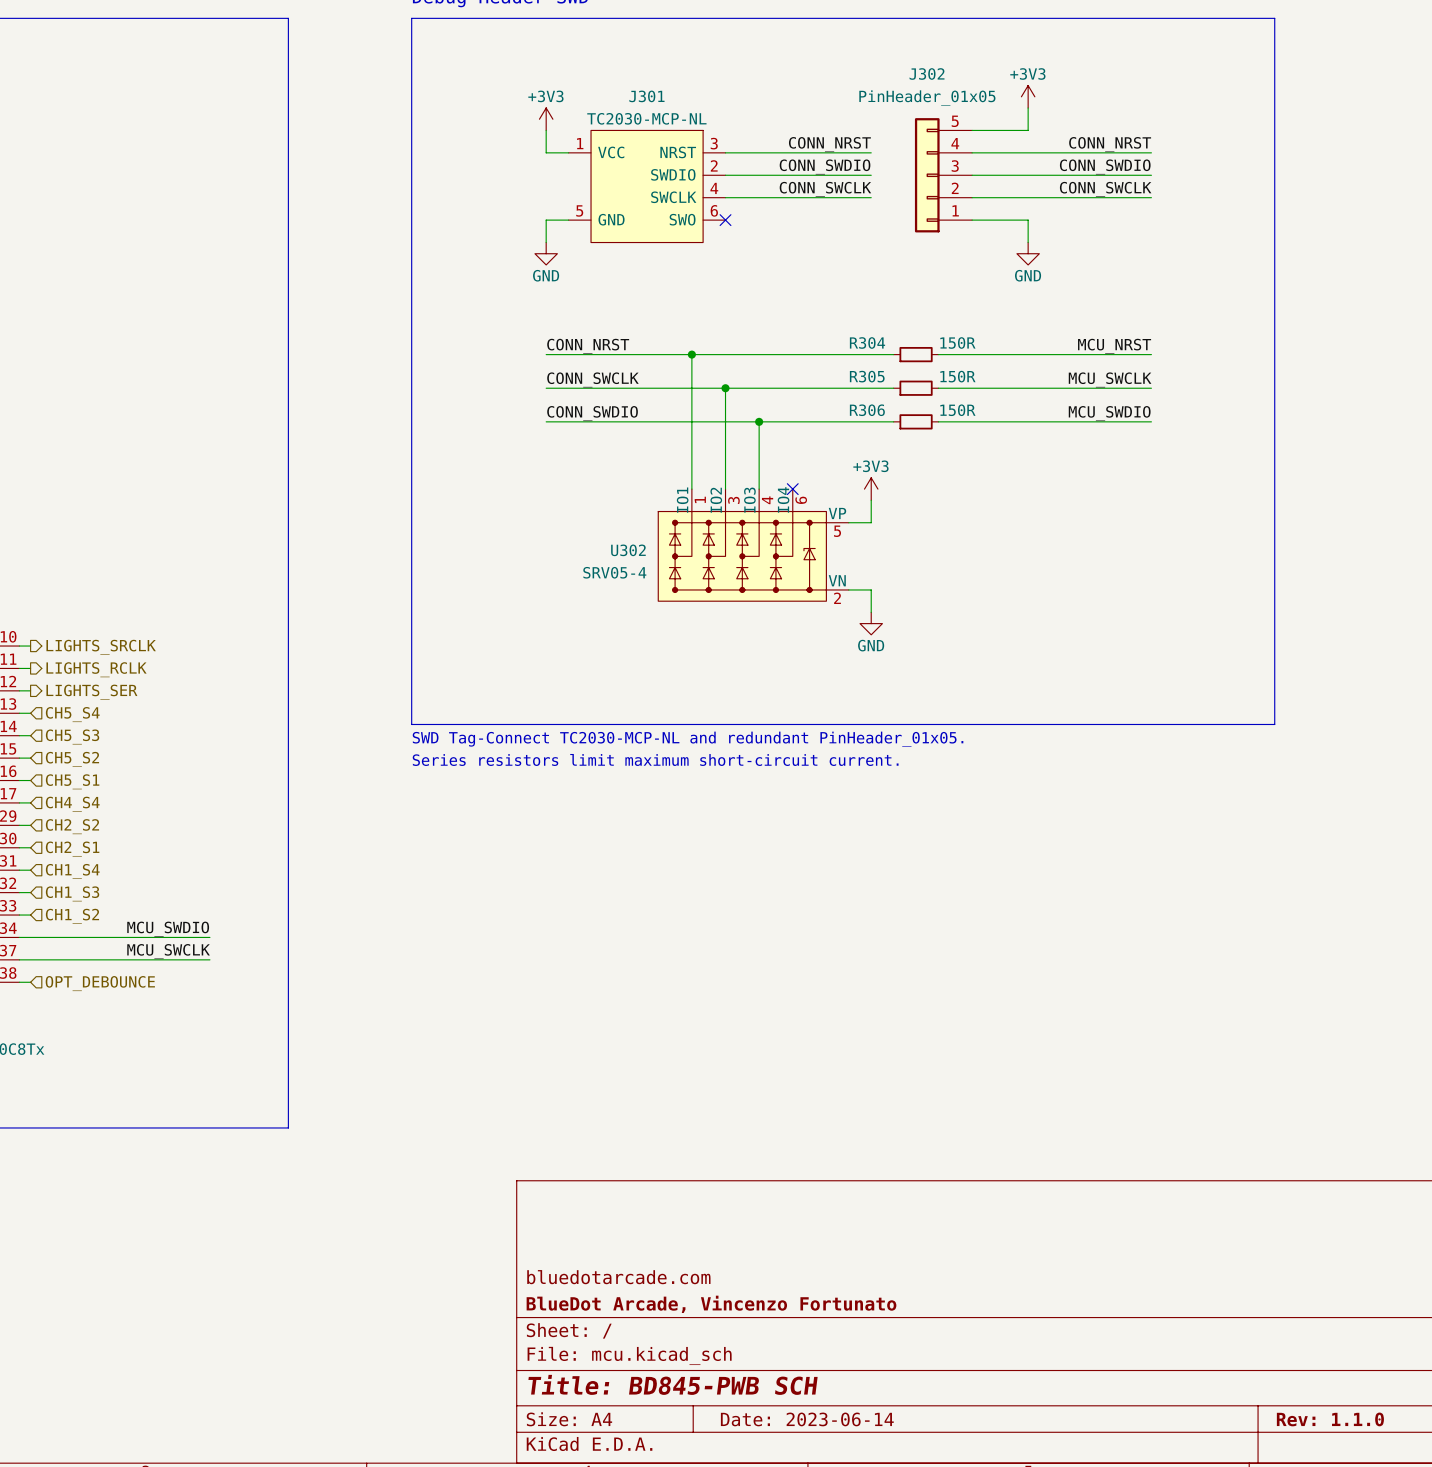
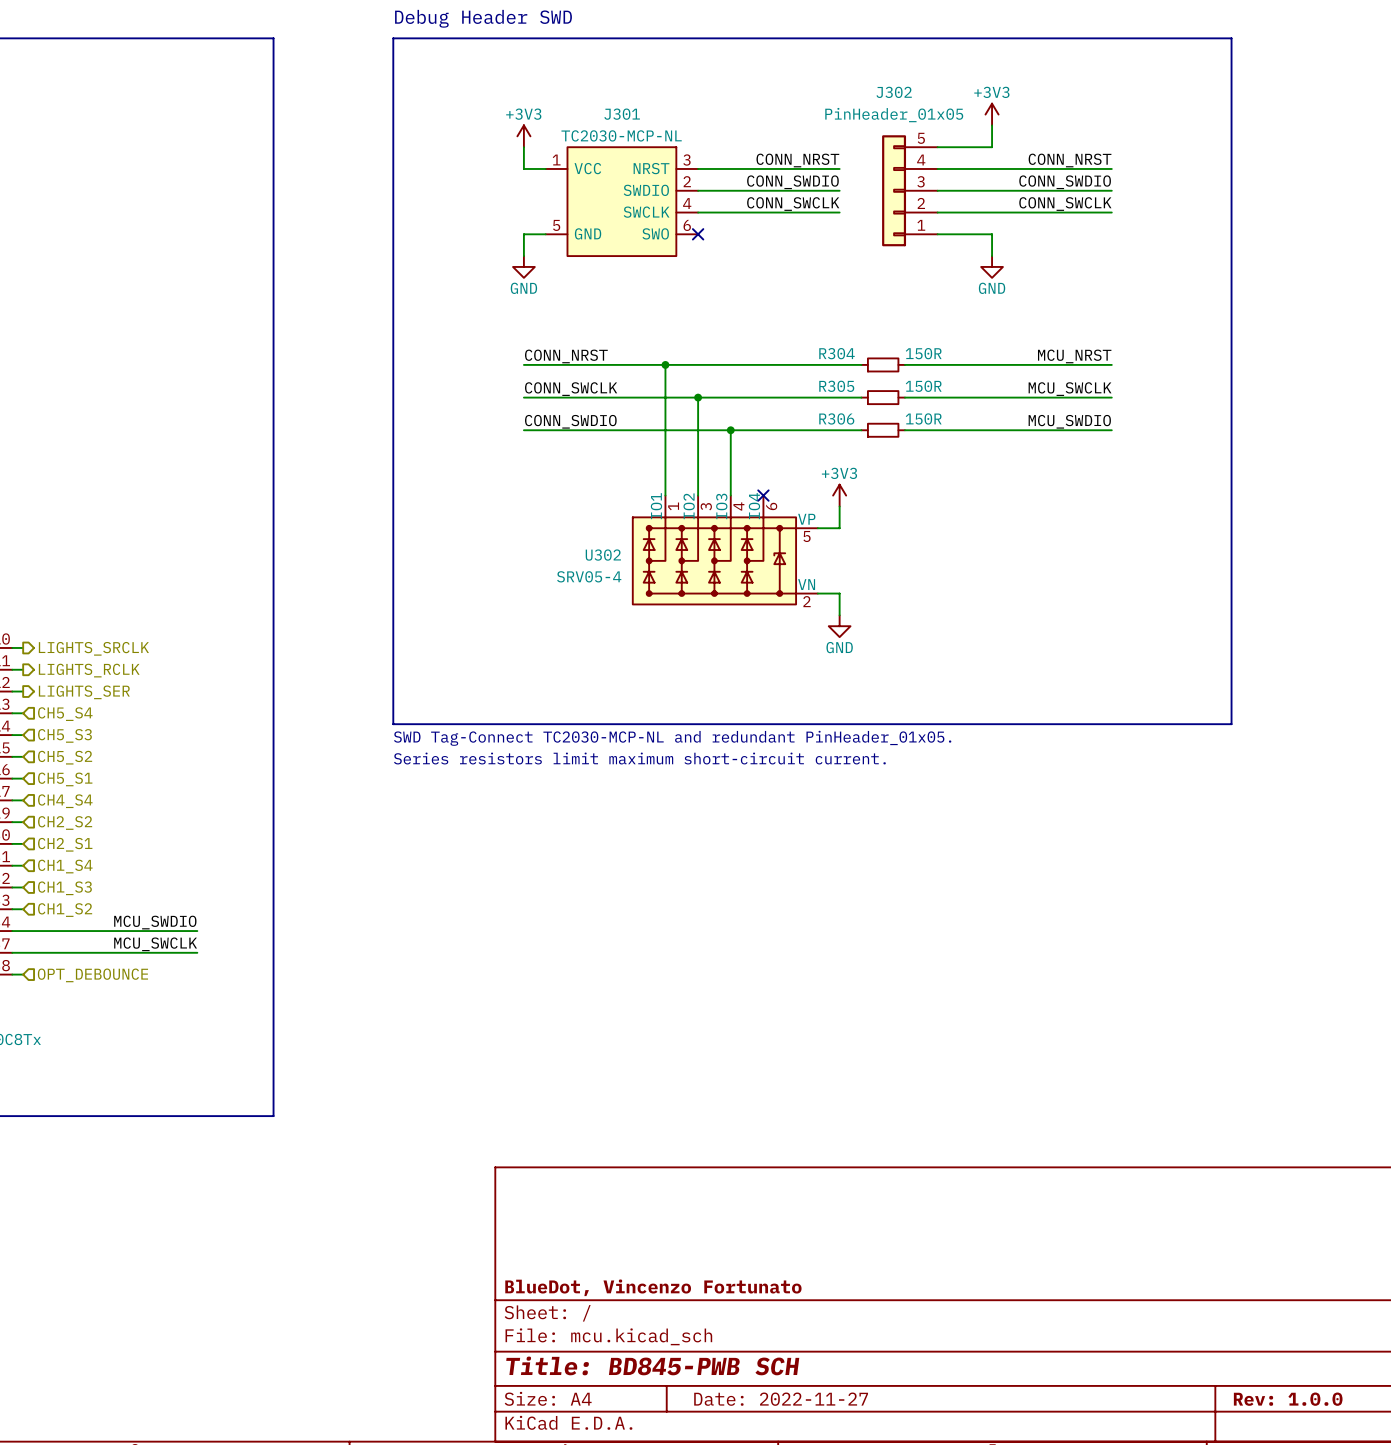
title block: bluedotarcade.com (618, 1277) -> none
title block: BlueDot Arcade, Vincenzo Fortunato (711, 1304) -> BlueDot, Vincenzo Fortunato (653, 1287)
title block: Date: 2023-06-14 (807, 1419) -> Date: 2022-11-27 (781, 1399)
title block: Rev: 1.1.0 (1330, 1419) -> Rev: 1.0.0 (1288, 1399)

